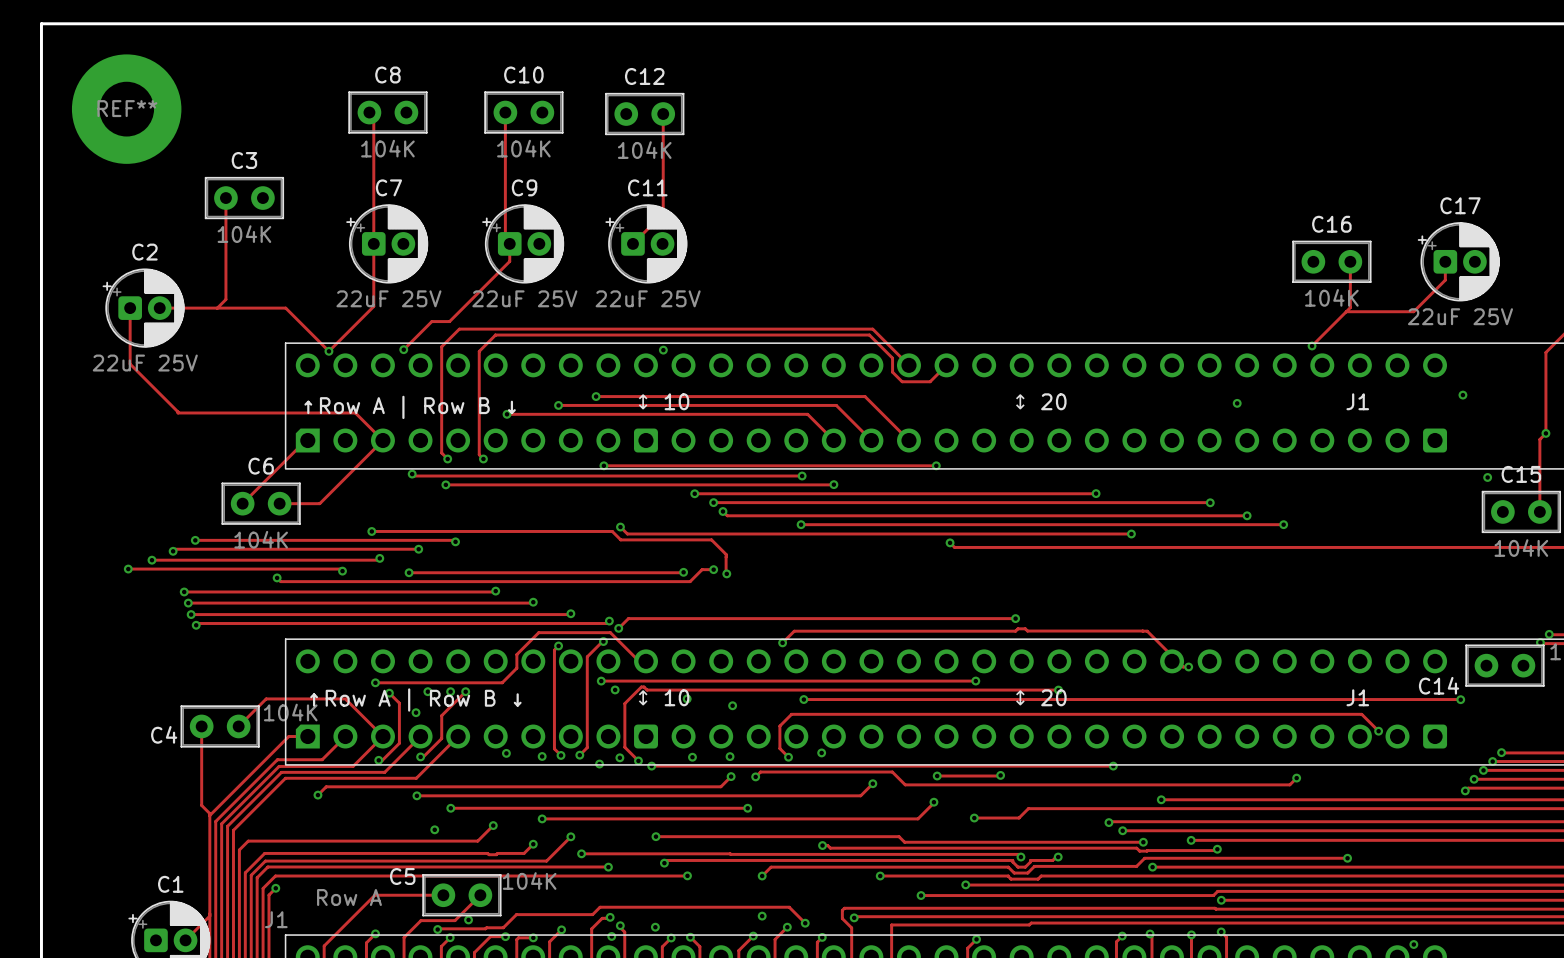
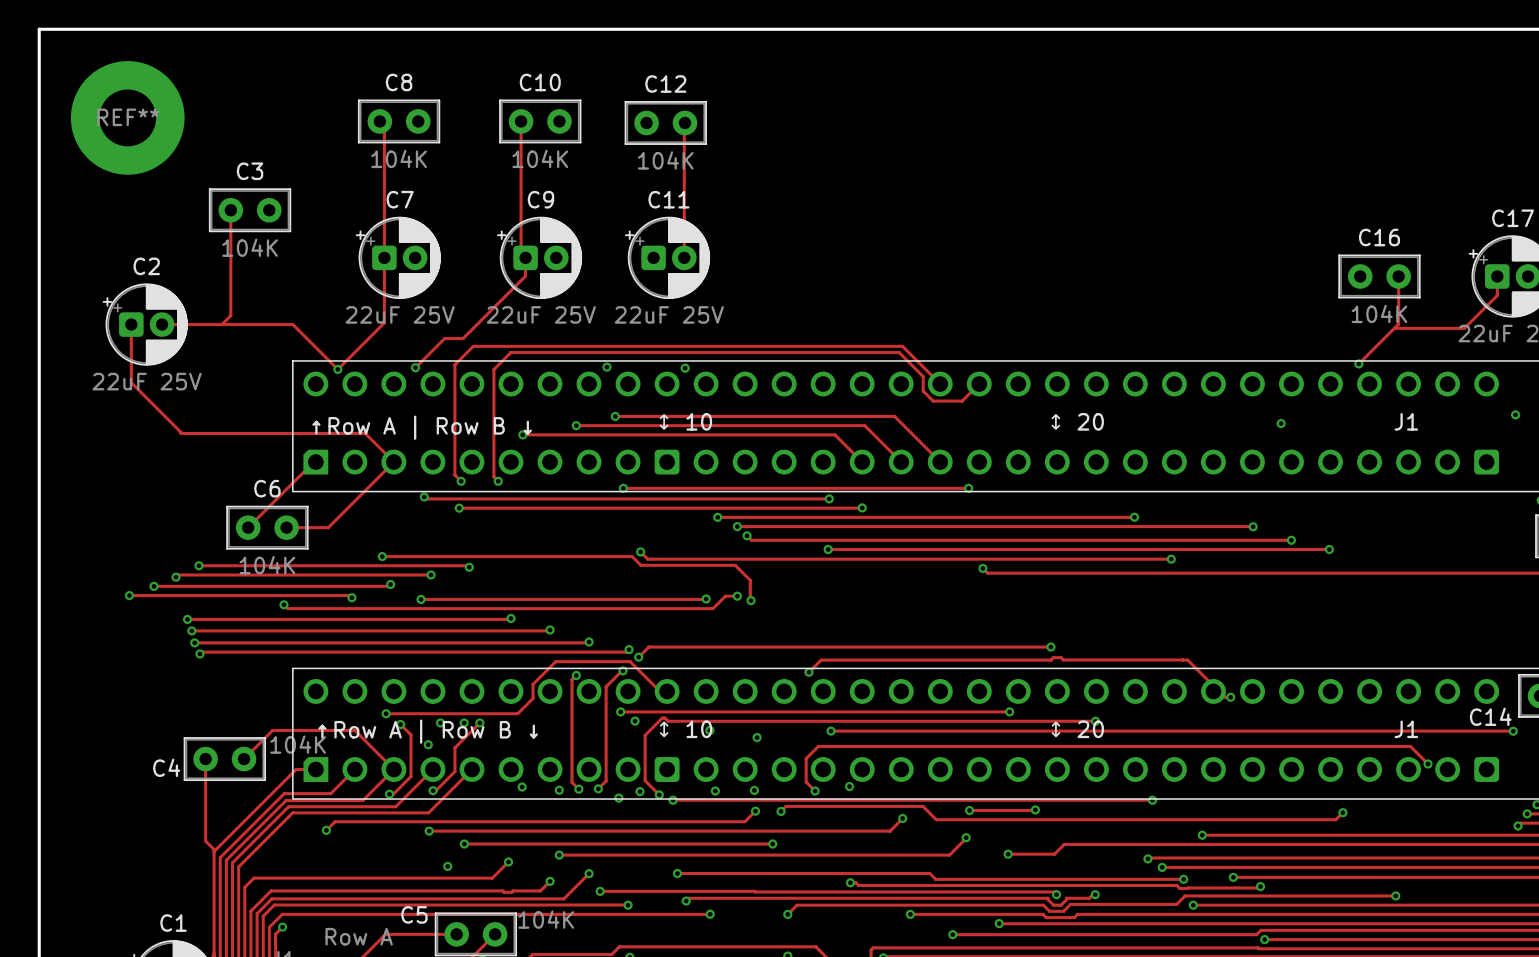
track: (663, 114) (663, 213) (632, 243) -> none
track: none -> (684, 124) (684, 257)
via: none -> (606, 367)

